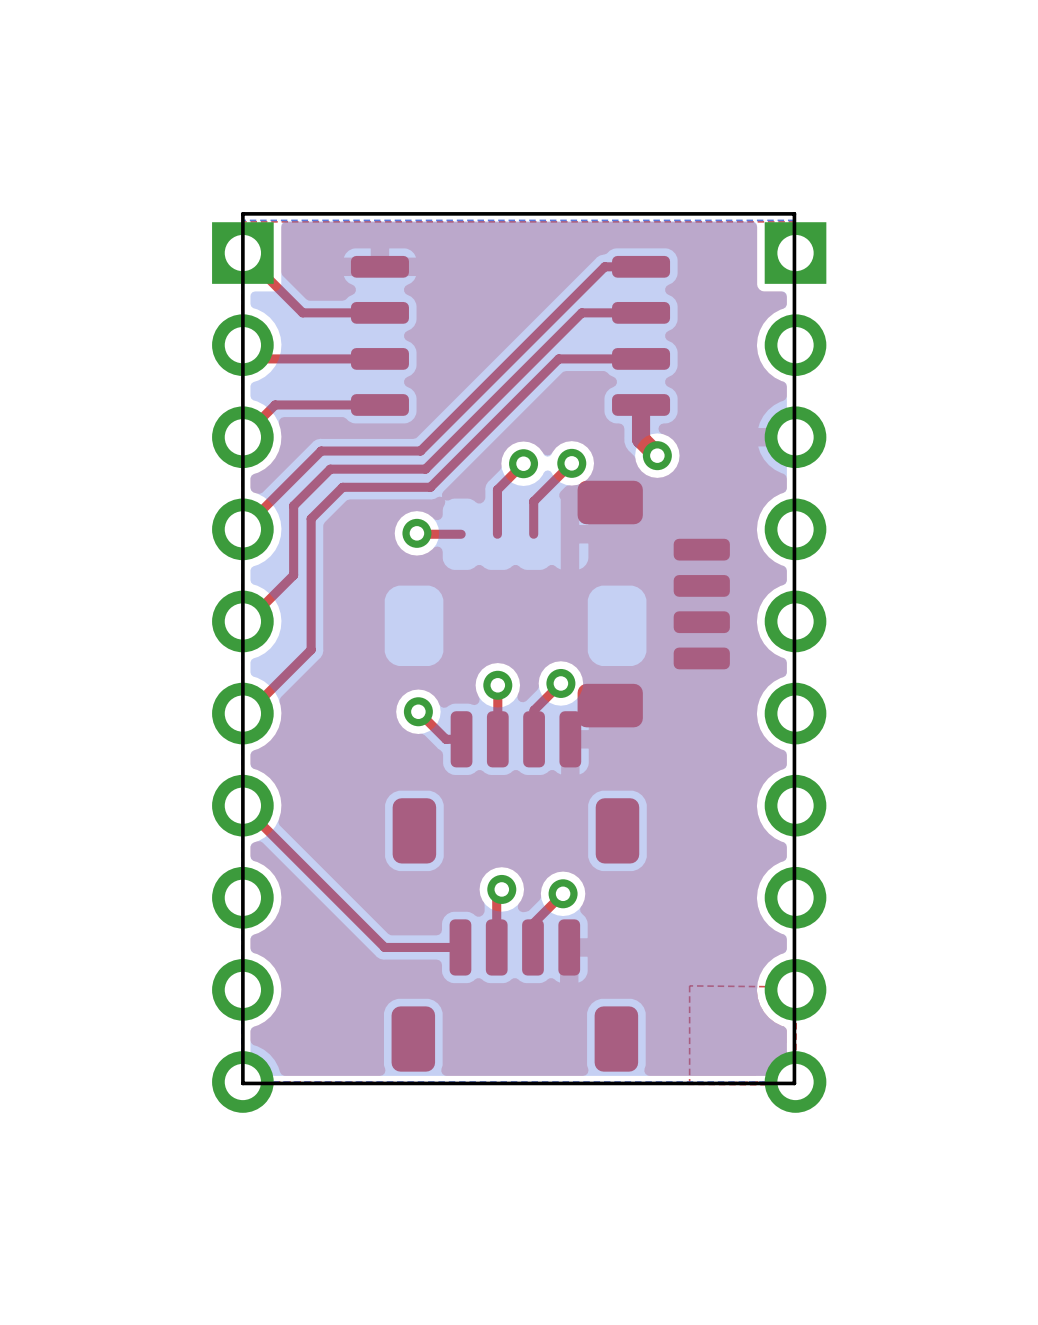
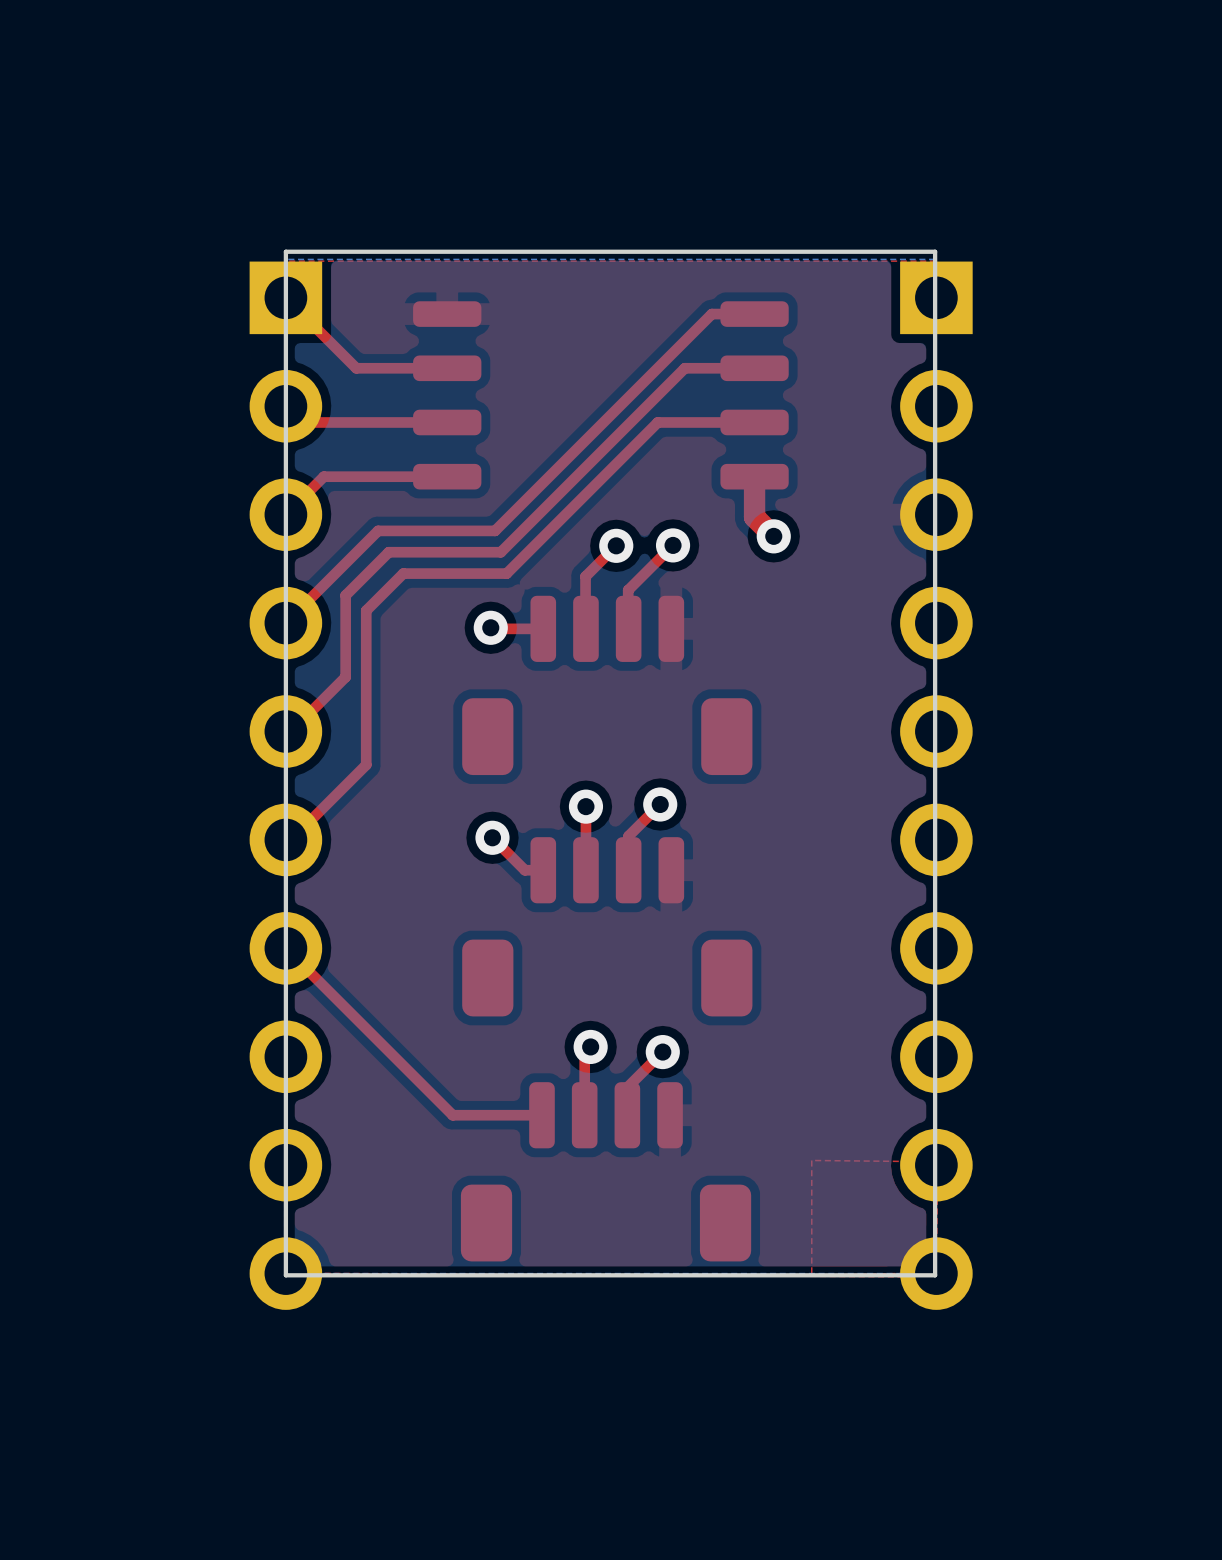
part rotation: 0° (653, 604) -> 90° counterclockwise (607, 685)

